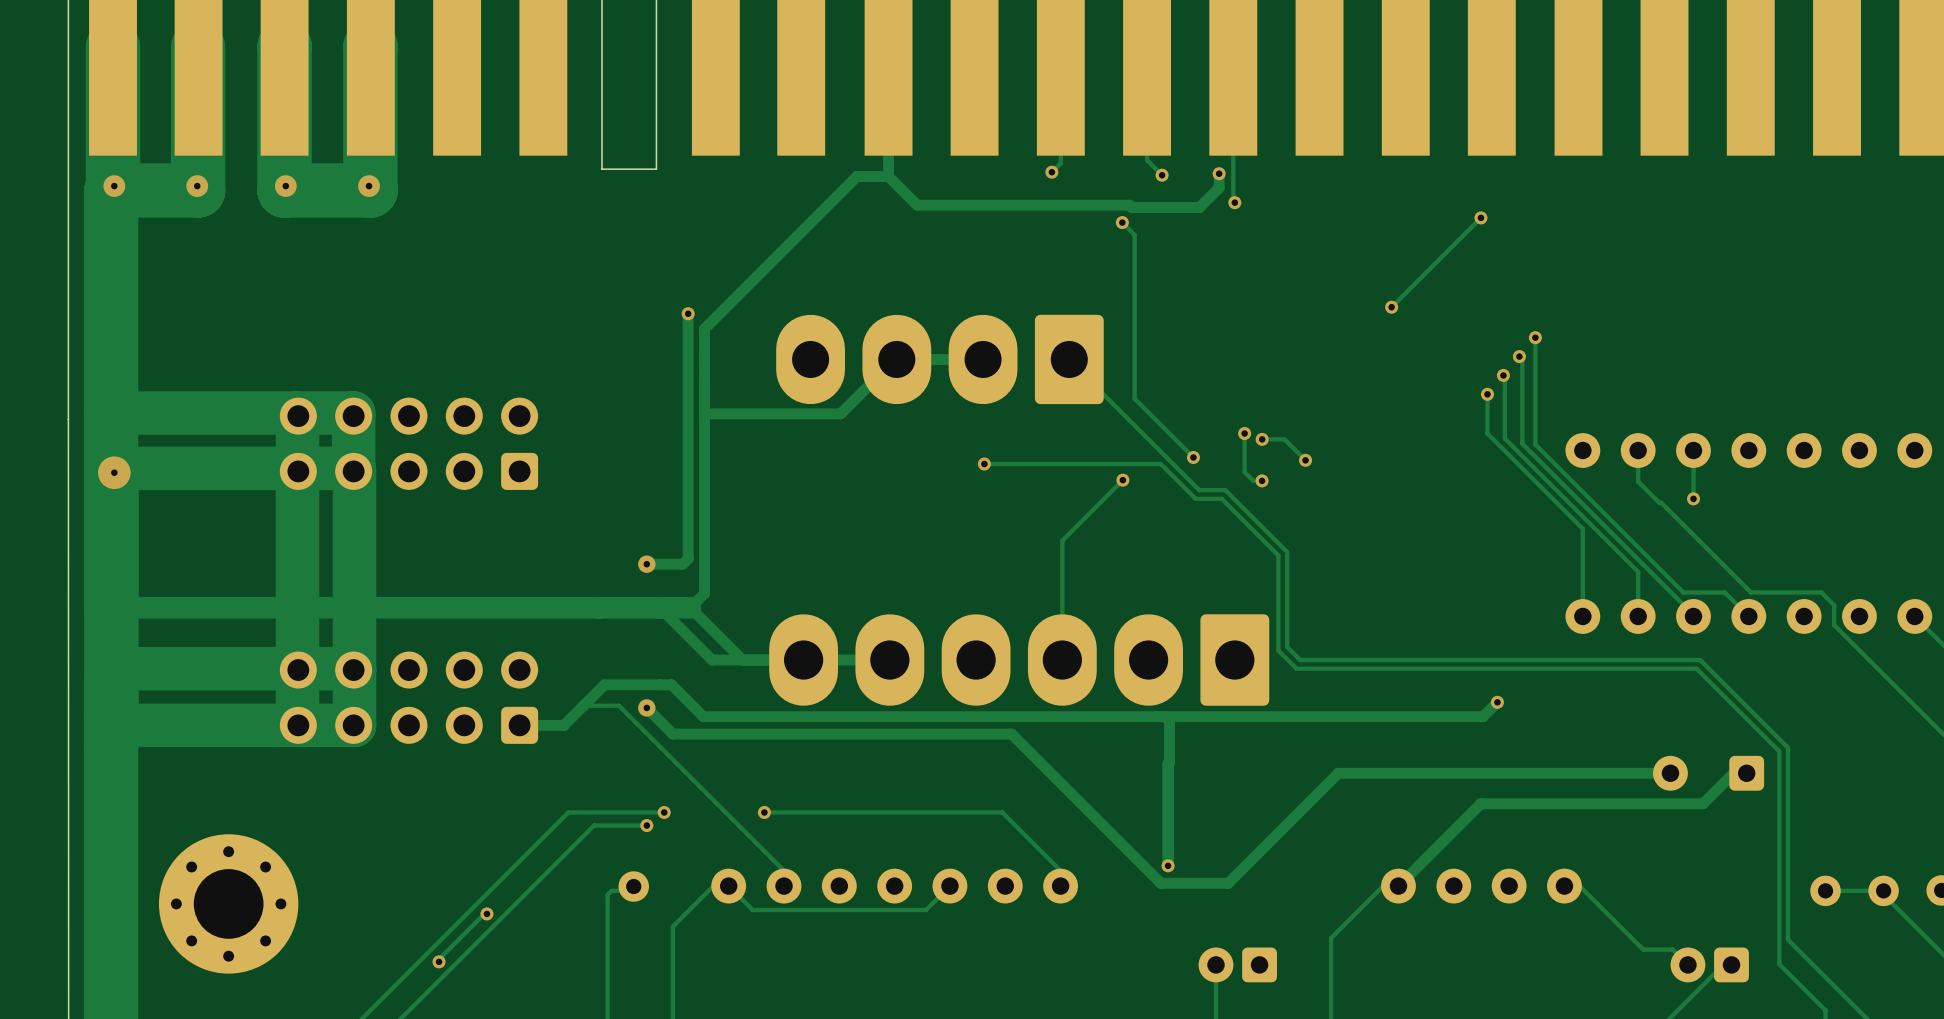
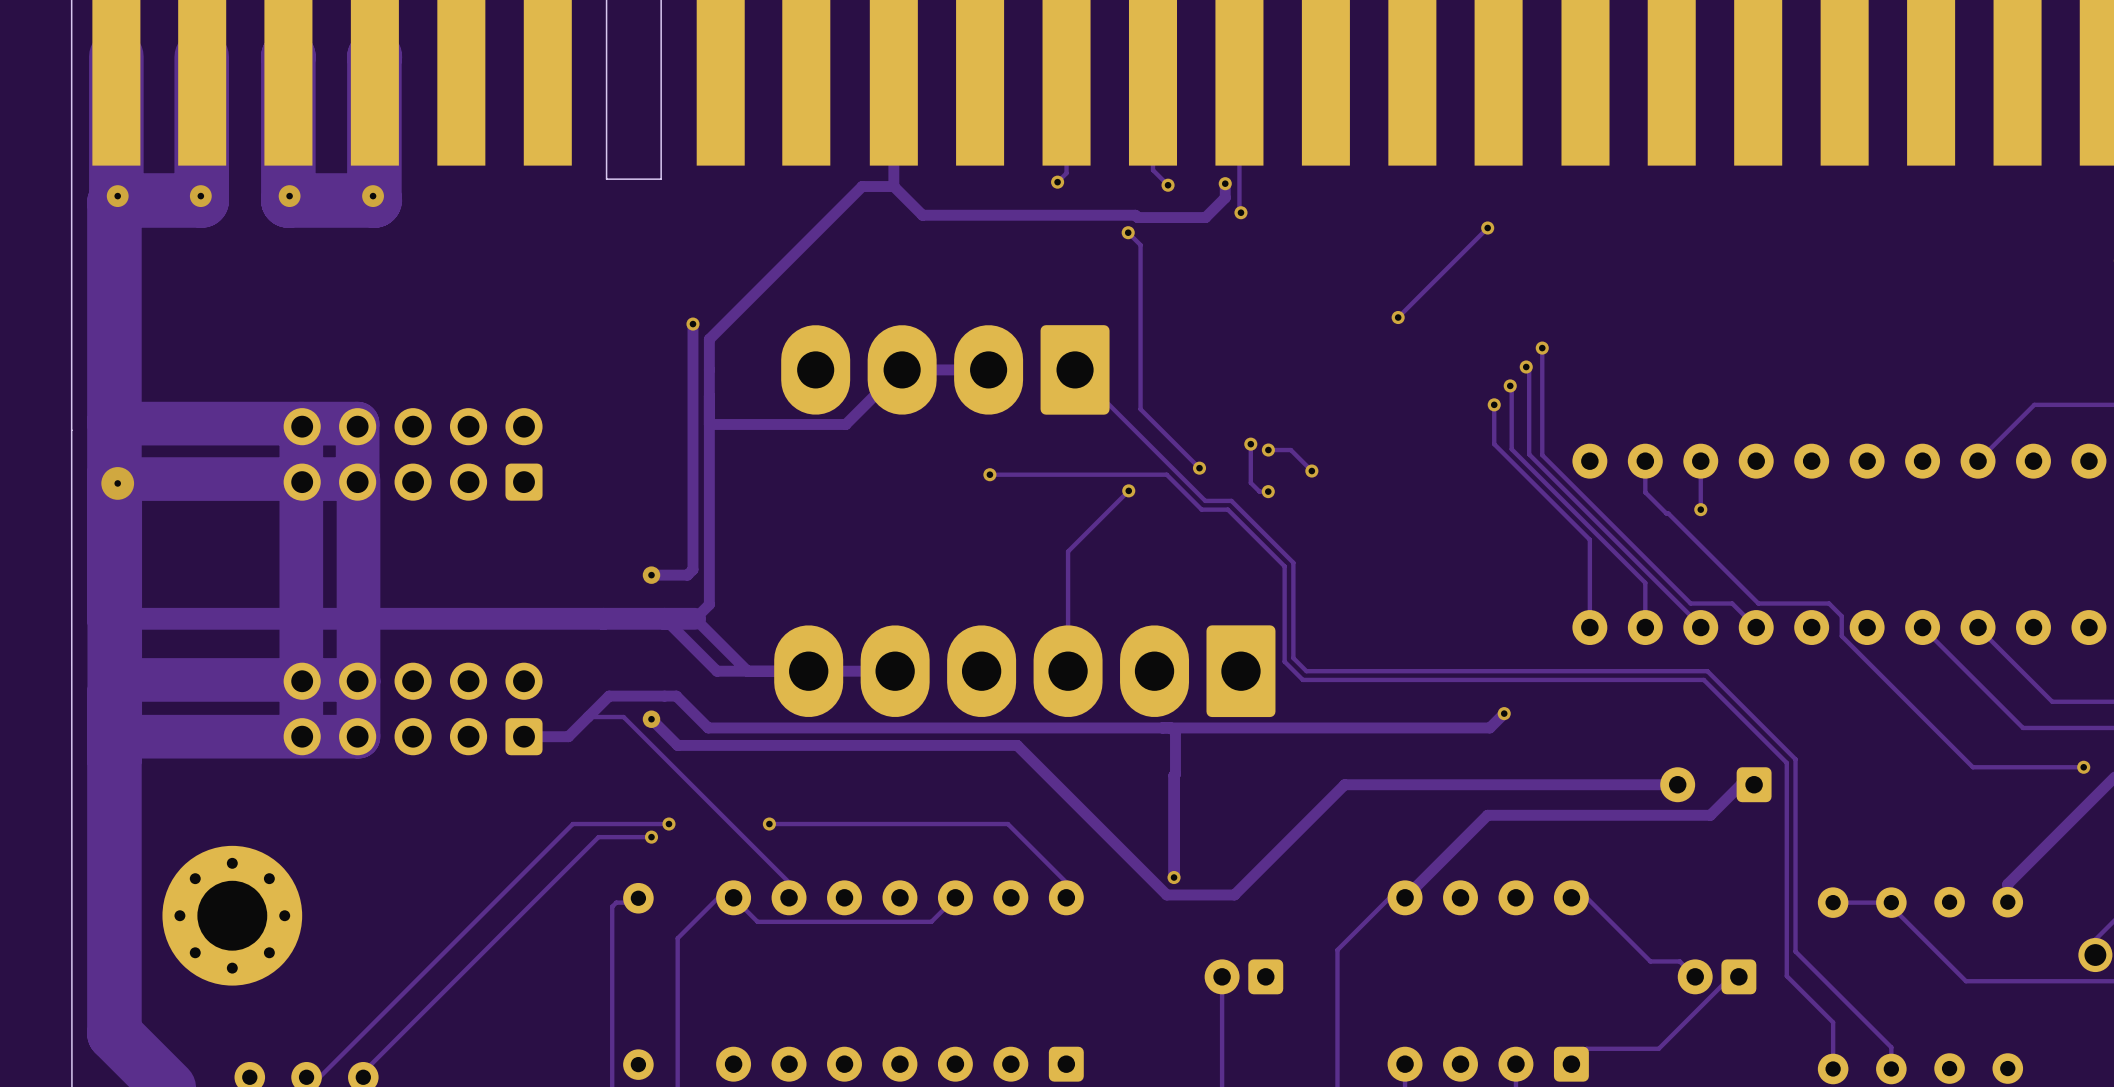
track: (486, 913) (484, 913) (439, 959) (439, 961) -> none
via: (486, 913) -> none
via: (439, 961) -> none

